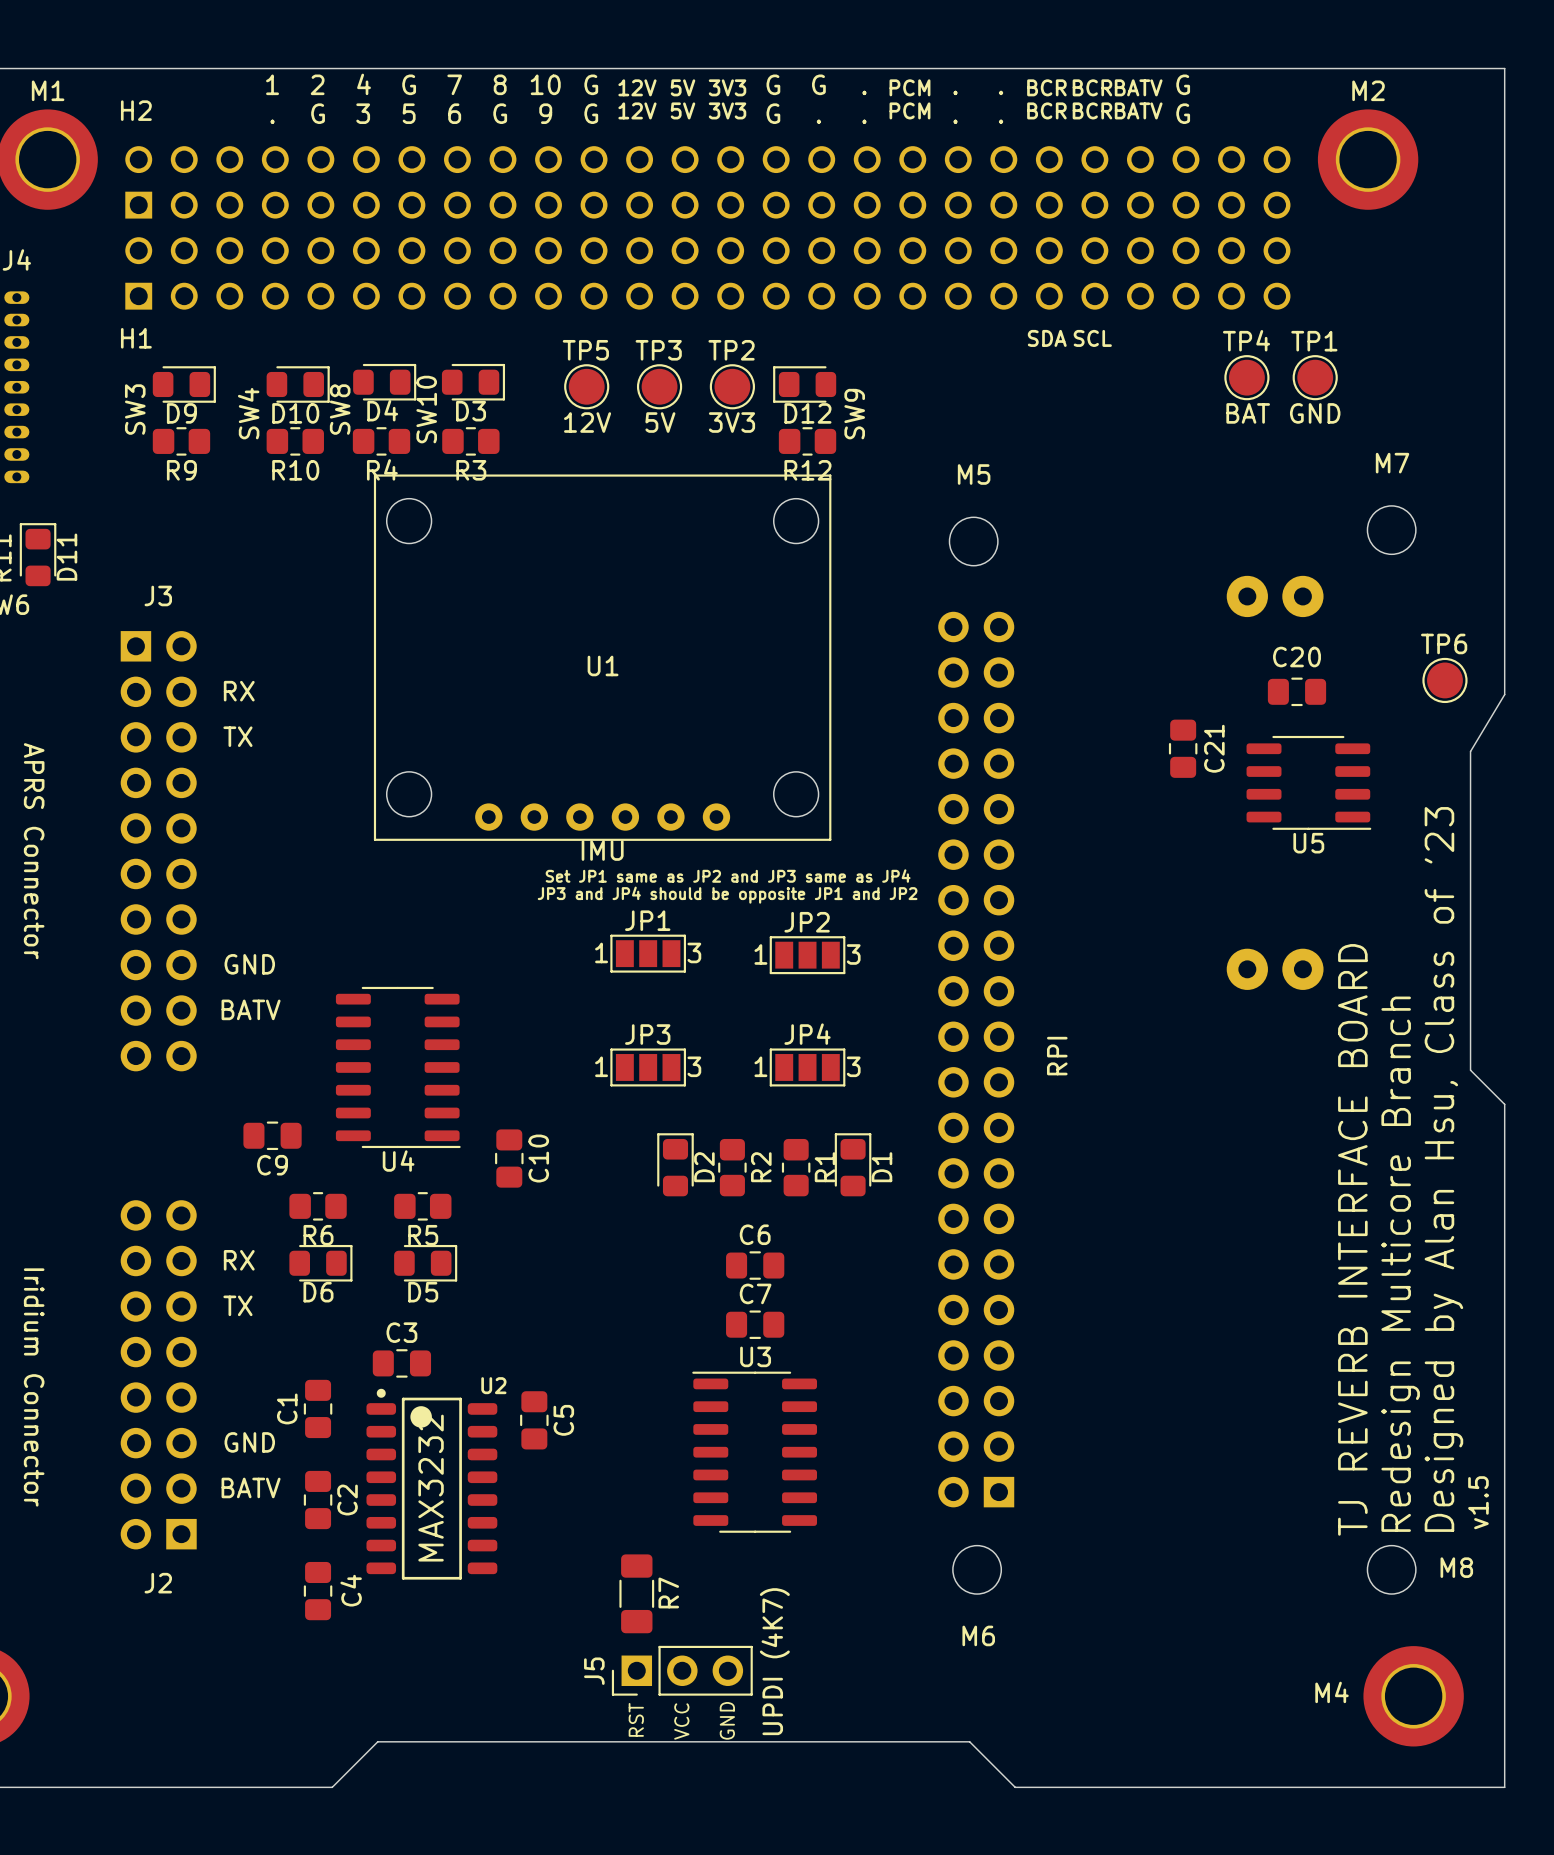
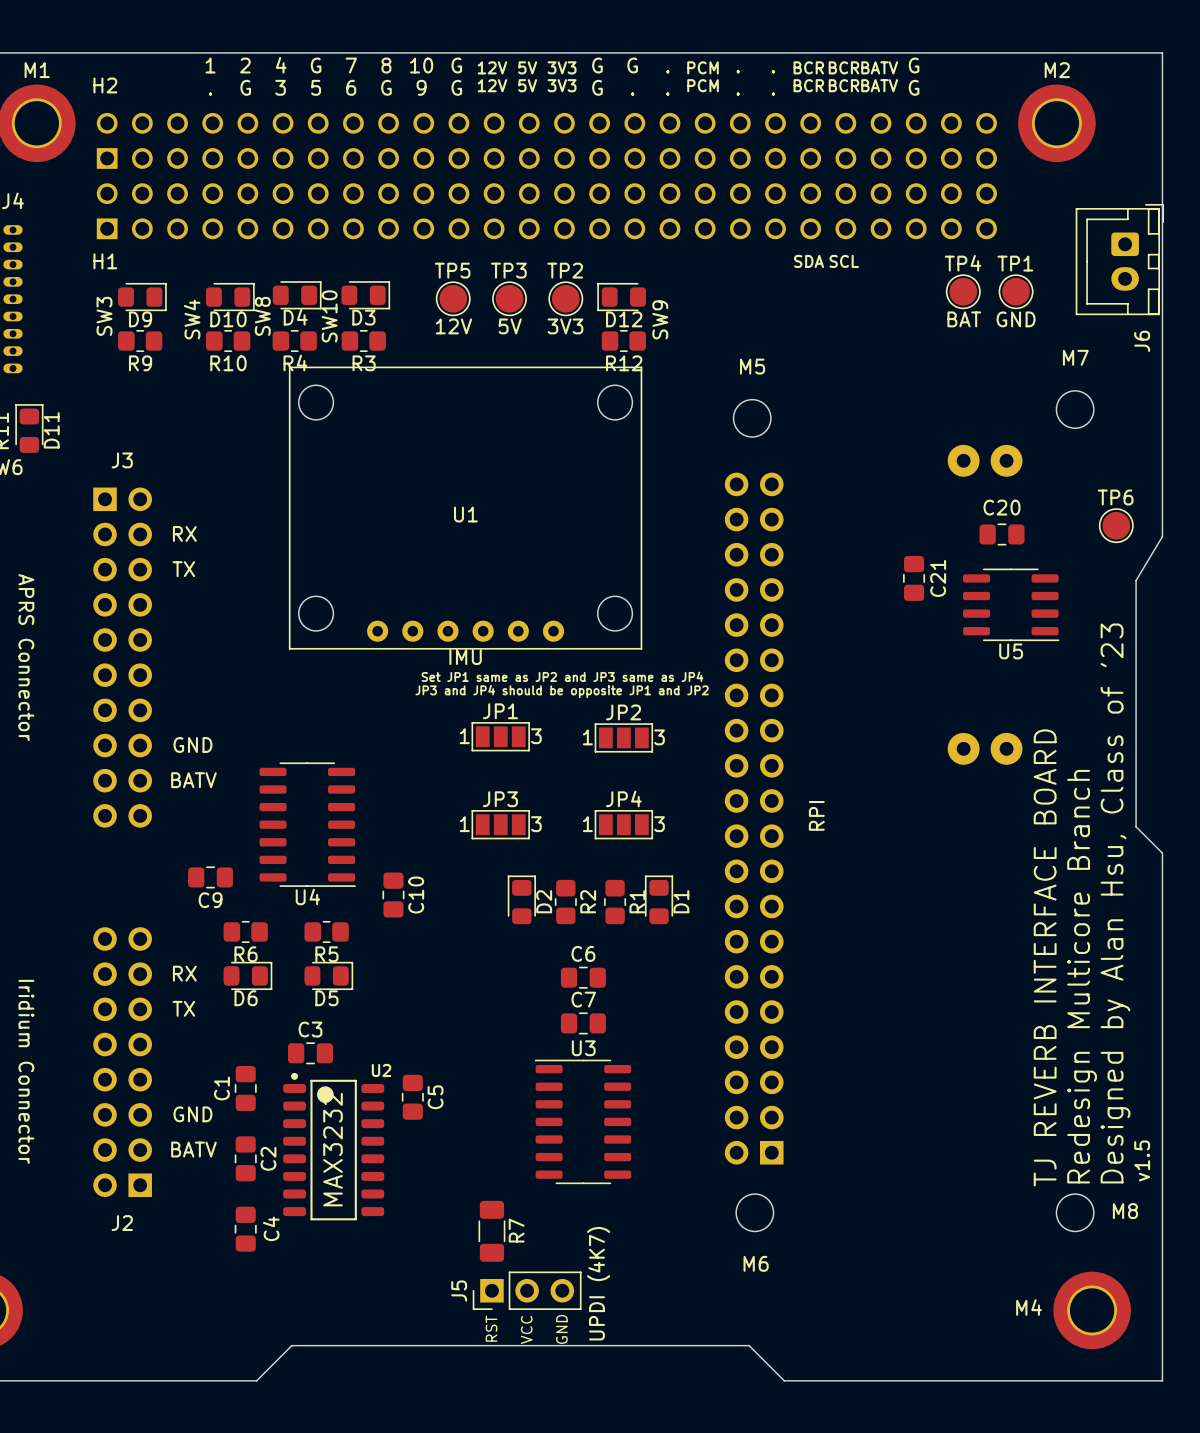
J6: none -> (1119, 259)

